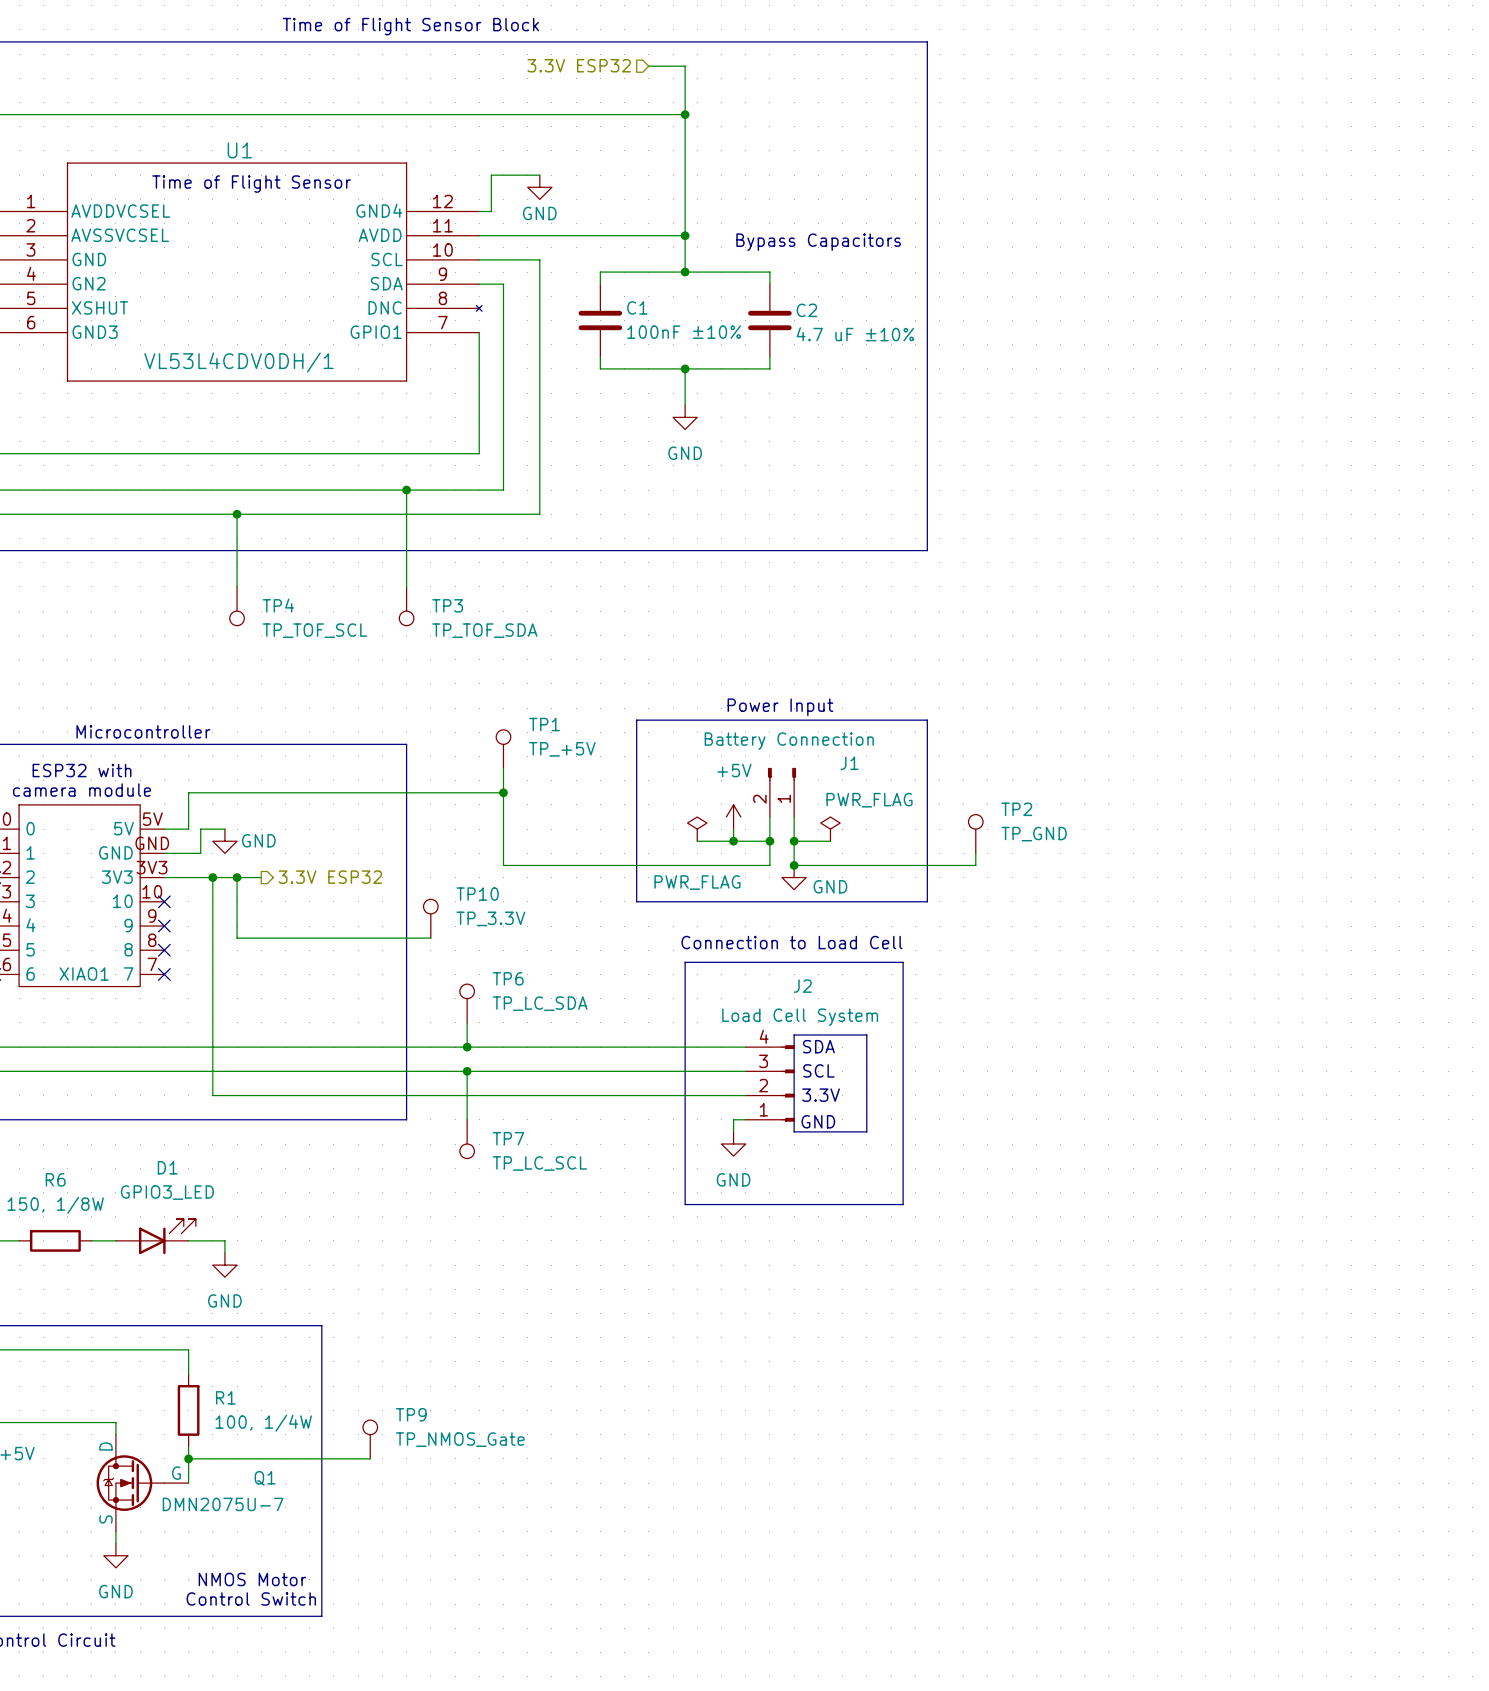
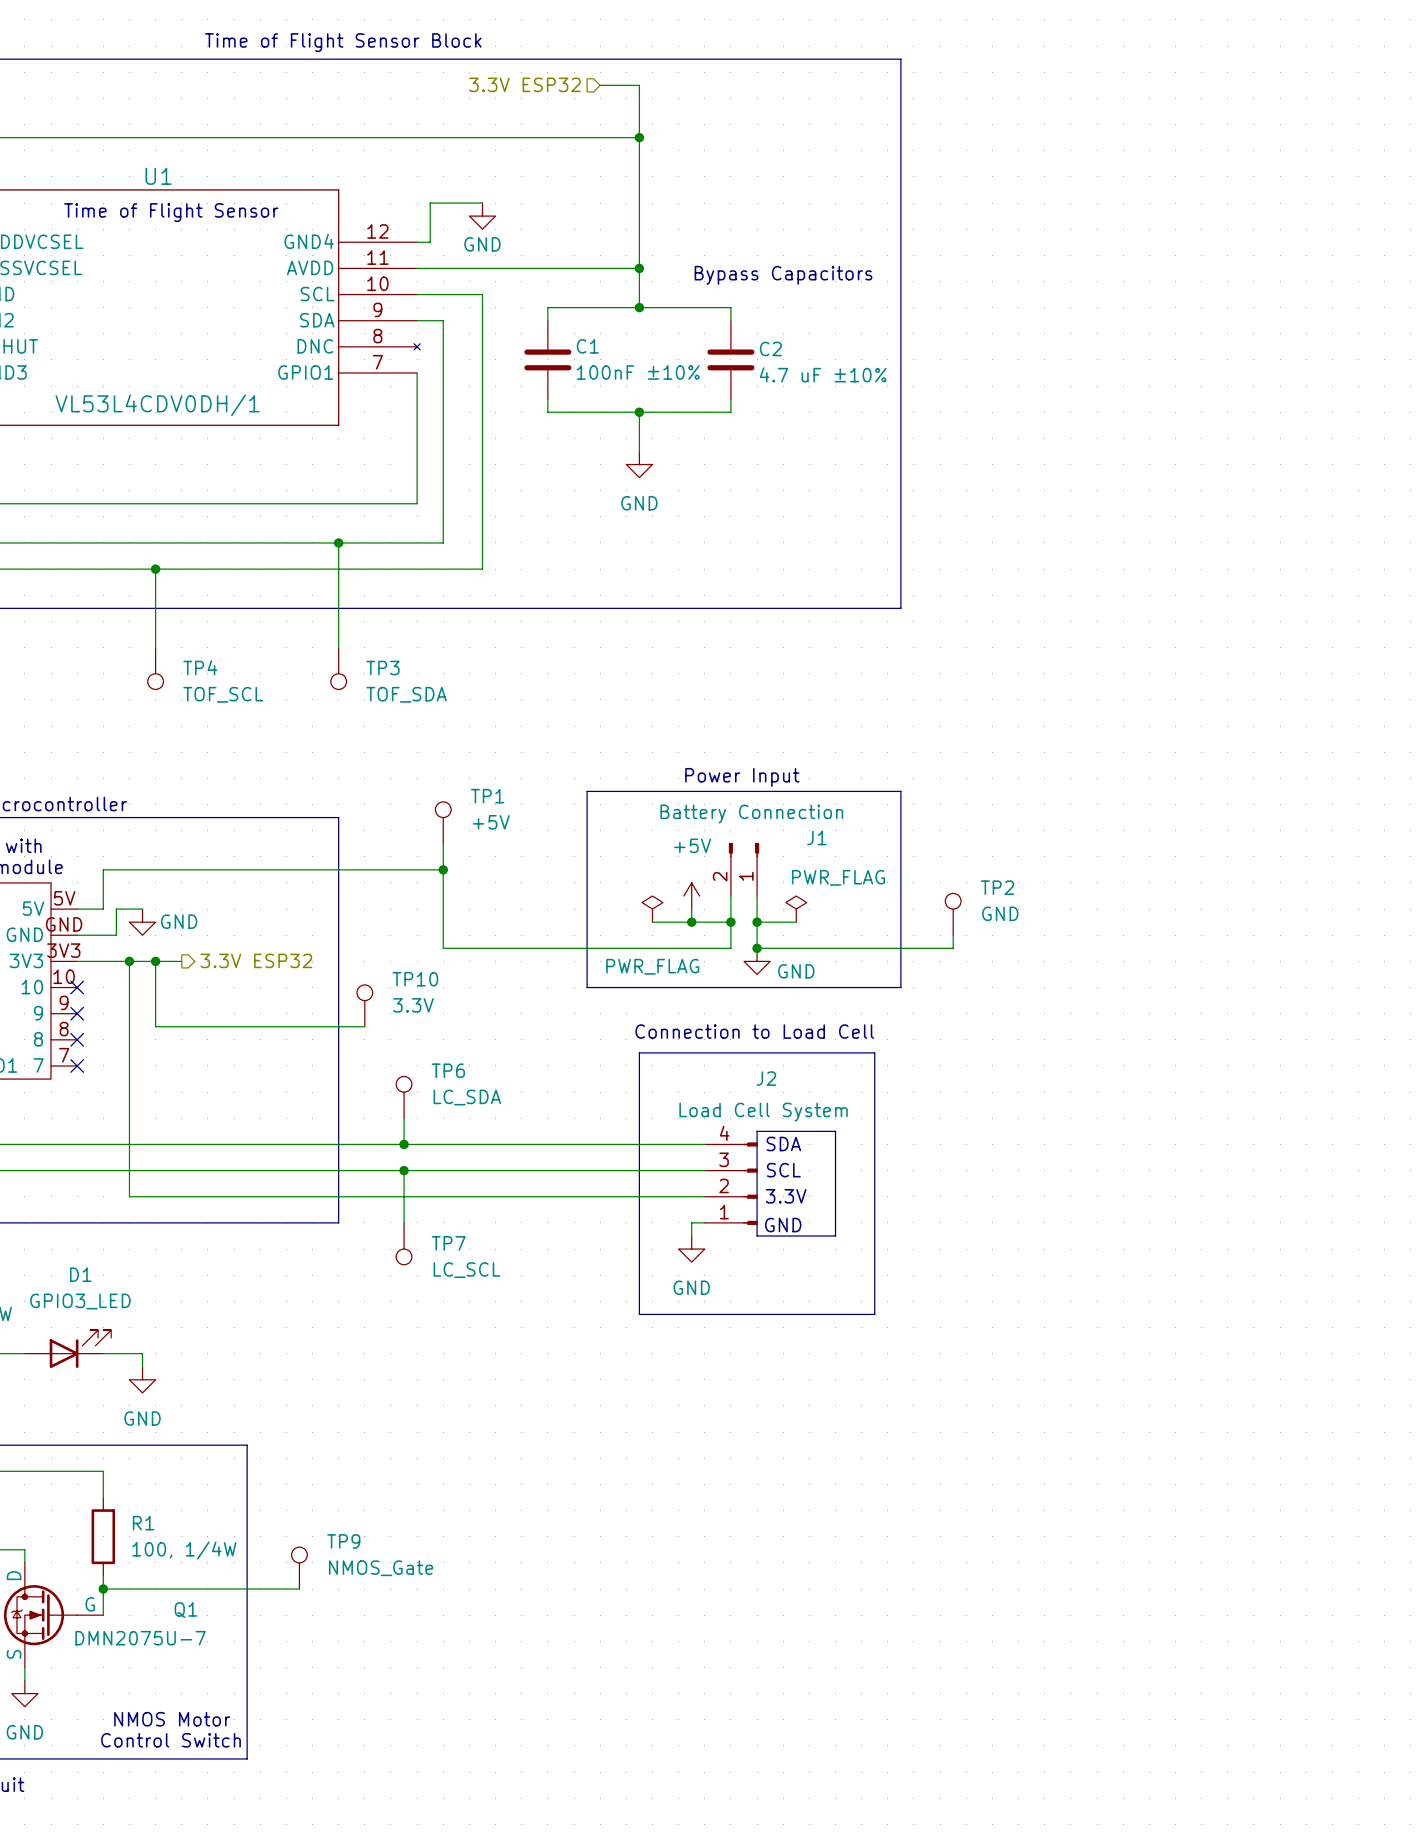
TP4 value: TP_TOF_SCL (314, 630) -> TOF_SCL (223, 694)
TP3 value: TP_TOF_SDA (484, 630) -> TOF_SDA (406, 694)
TP1 value: TP_+5V (562, 749) -> +5V (491, 822)
TP2 value: TP_GND (1034, 834) -> GND (1000, 913)
TP10 value: TP_3.3V (490, 918) -> 3.3V (413, 1005)
TP6 value: TP_LC_SDA (540, 1003) -> LC_SDA (467, 1097)
TP7 value: TP_LC_SCL (539, 1163) -> LC_SCL (467, 1270)
TP9 value: TP_NMOS_Gate (460, 1439) -> NMOS_Gate (381, 1568)

